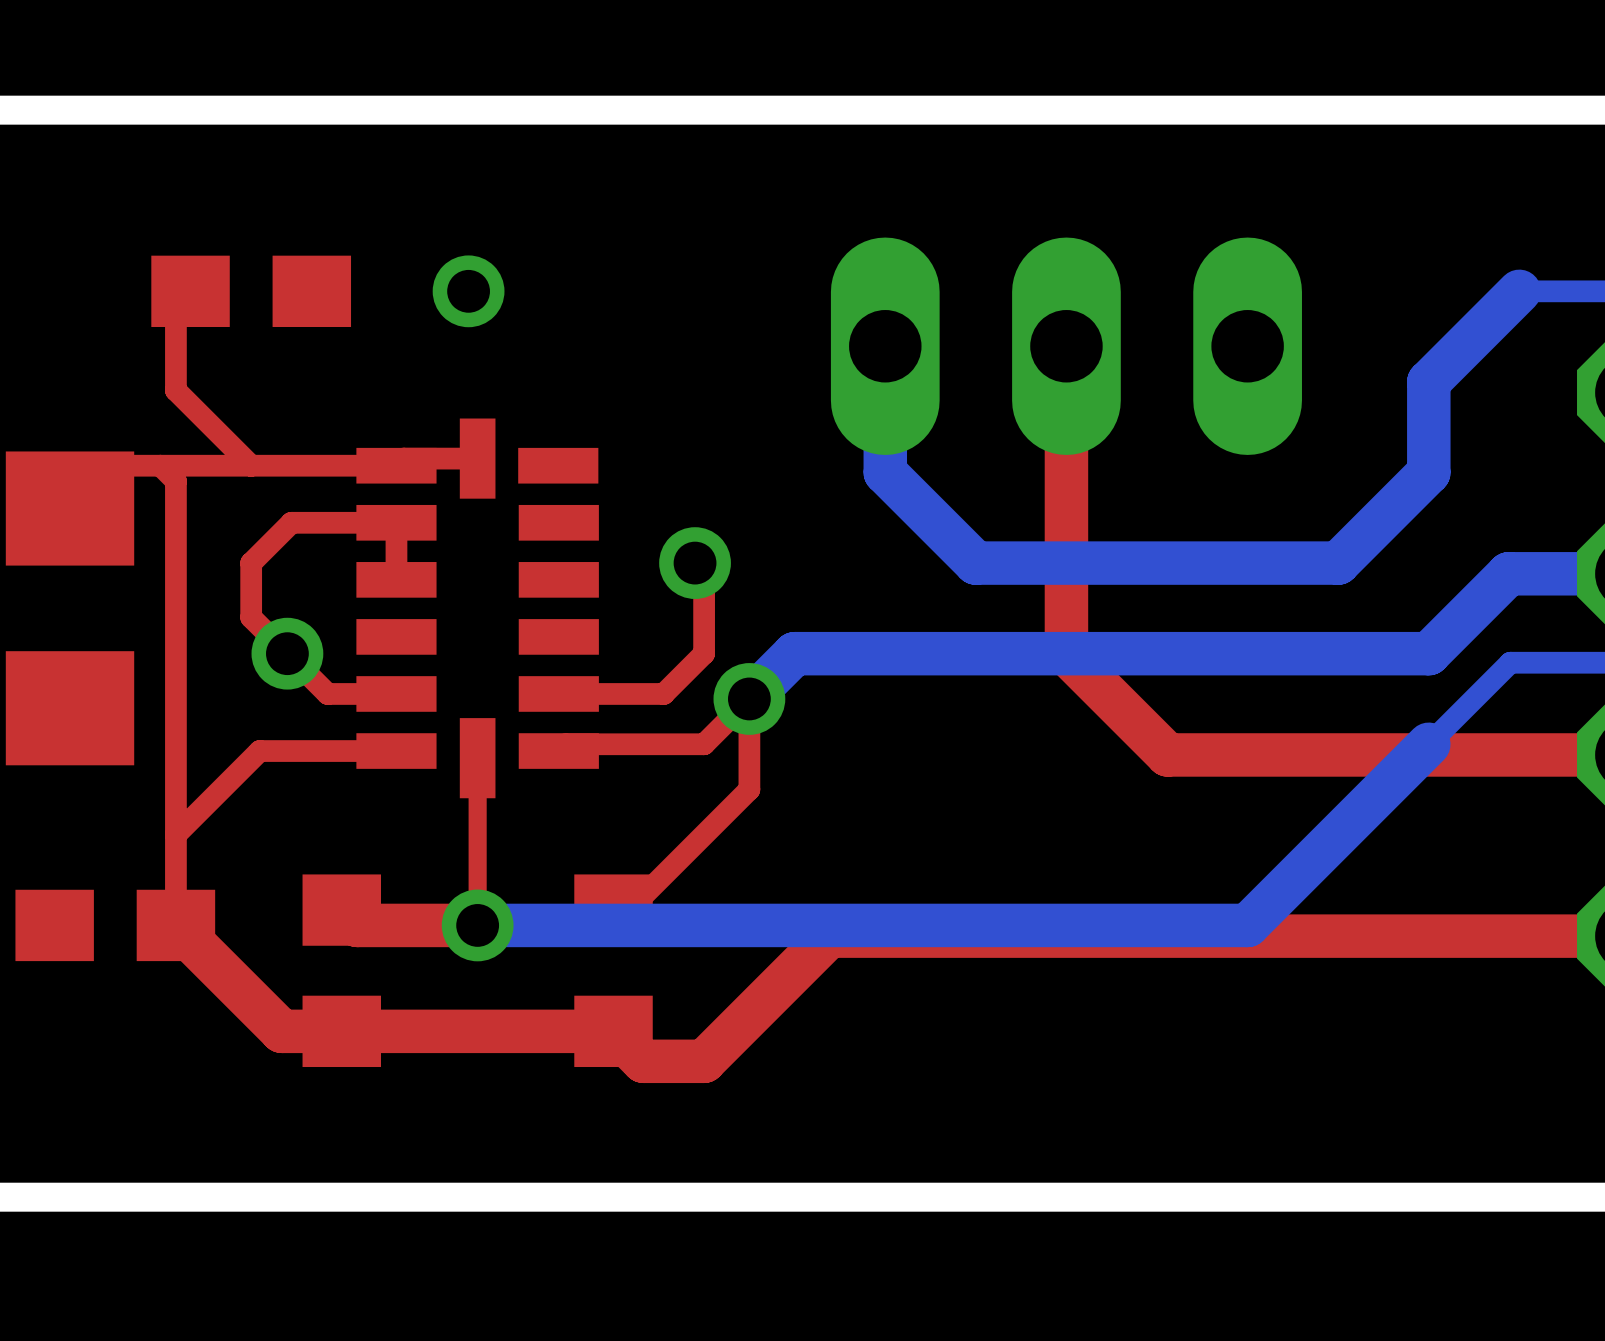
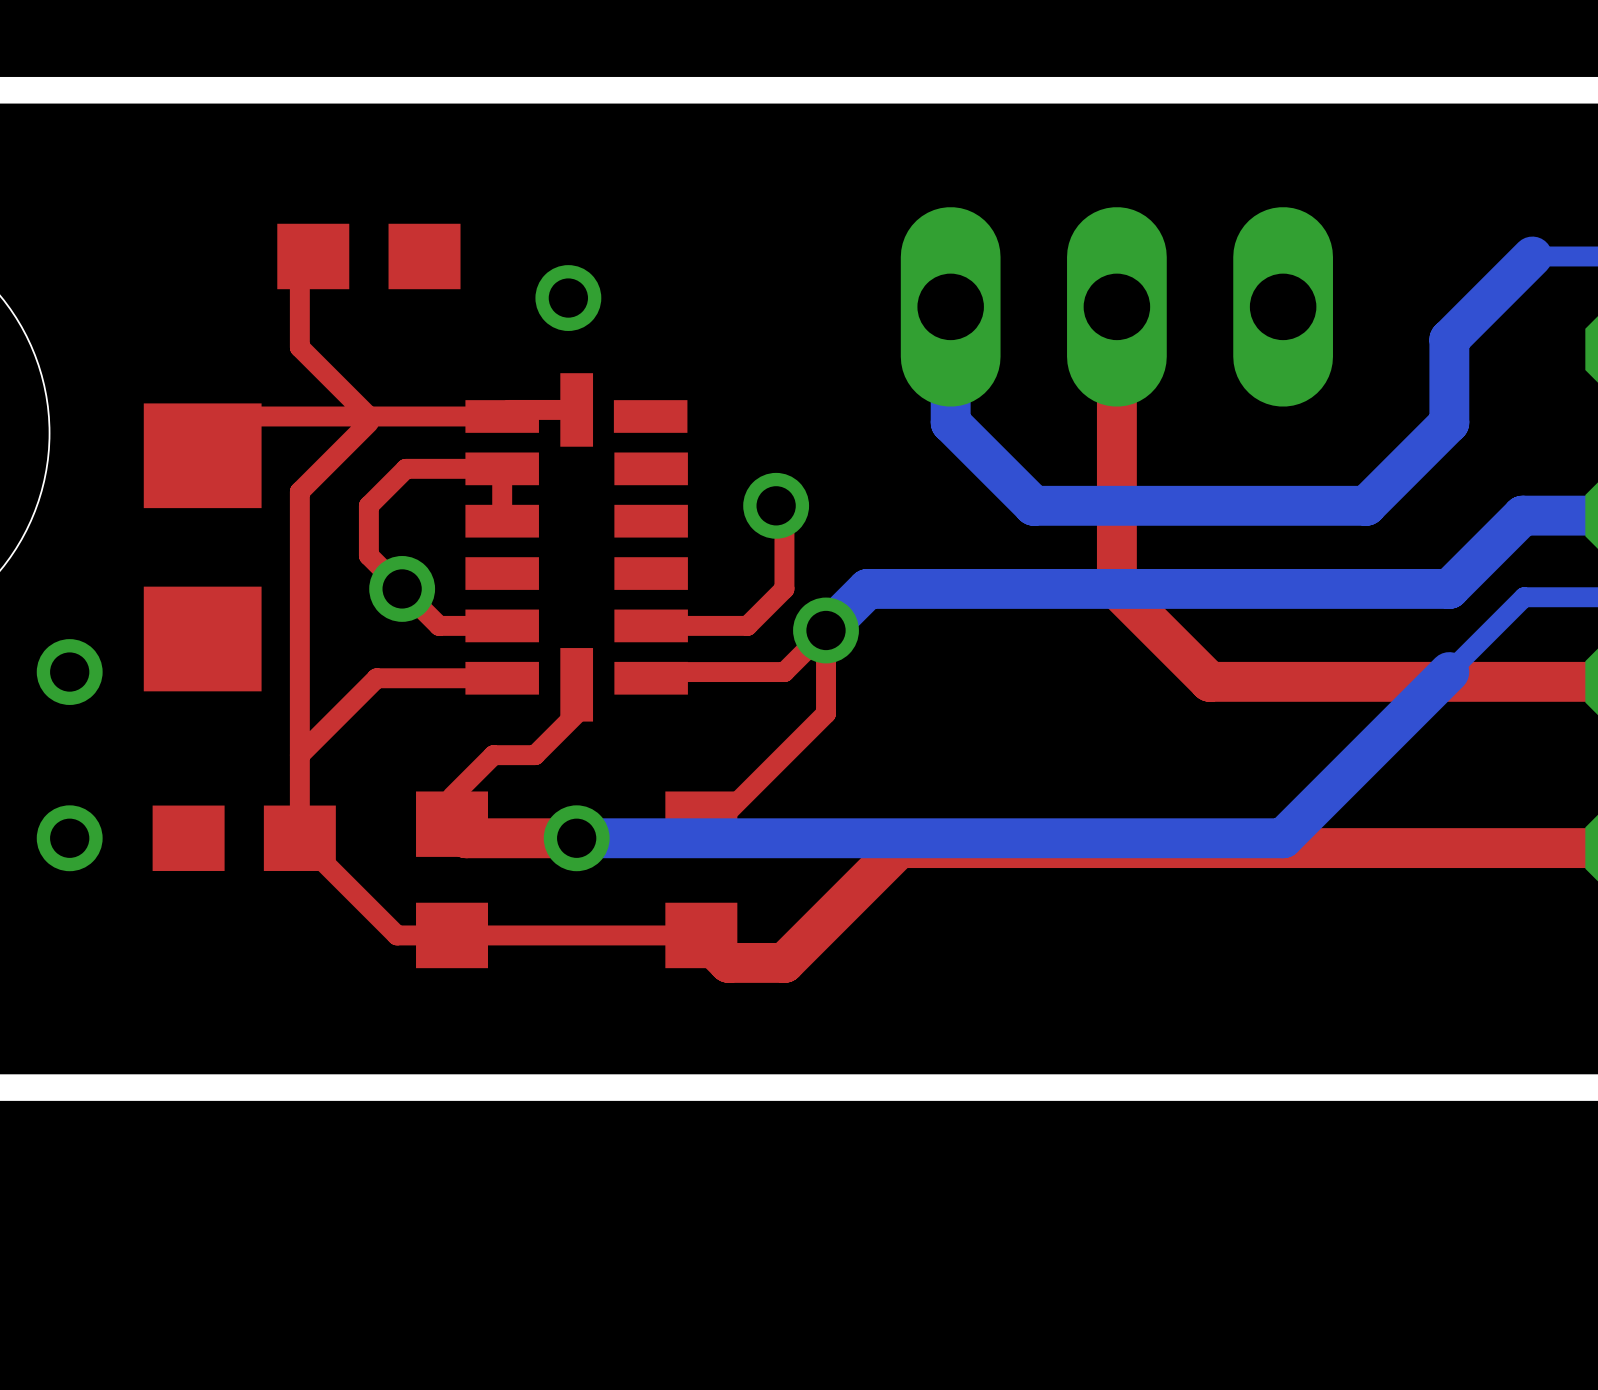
via position: (468, 291) -> (568, 298)
top track: (160, 465) (175, 481) (175, 547) -> (368, 422) (299, 491)
top track: (477, 789) (477, 925) -> (576, 713) (535, 755) (493, 755) (452, 796)
top track width: thick (175, 925) (281, 1031) (613, 1031) -> thin (299, 838) (397, 935) (701, 935)

